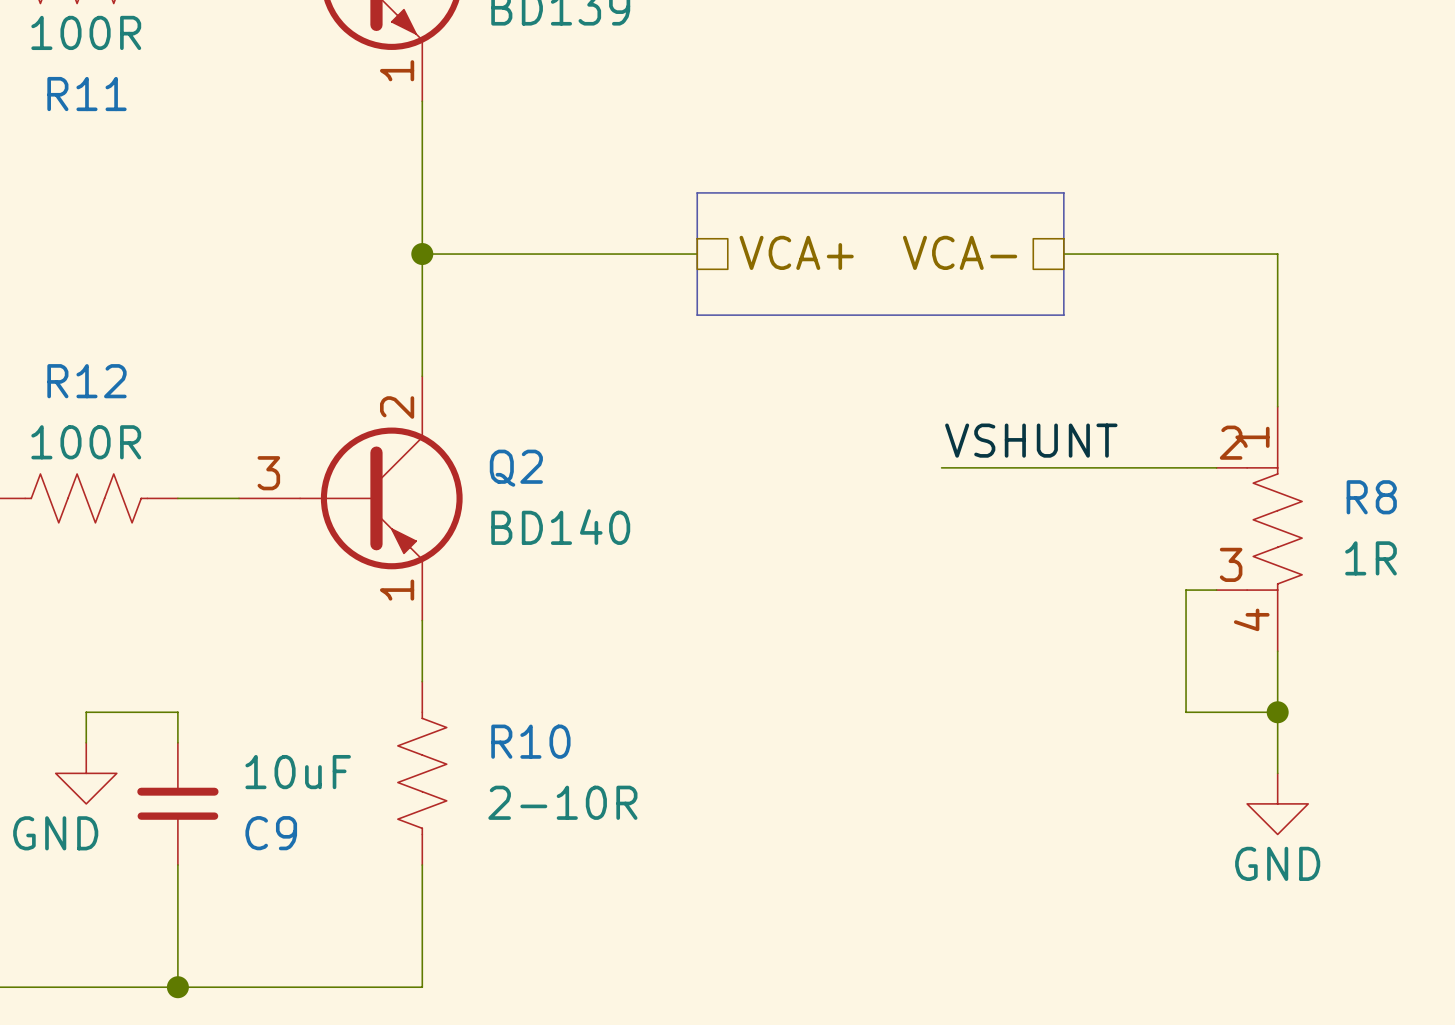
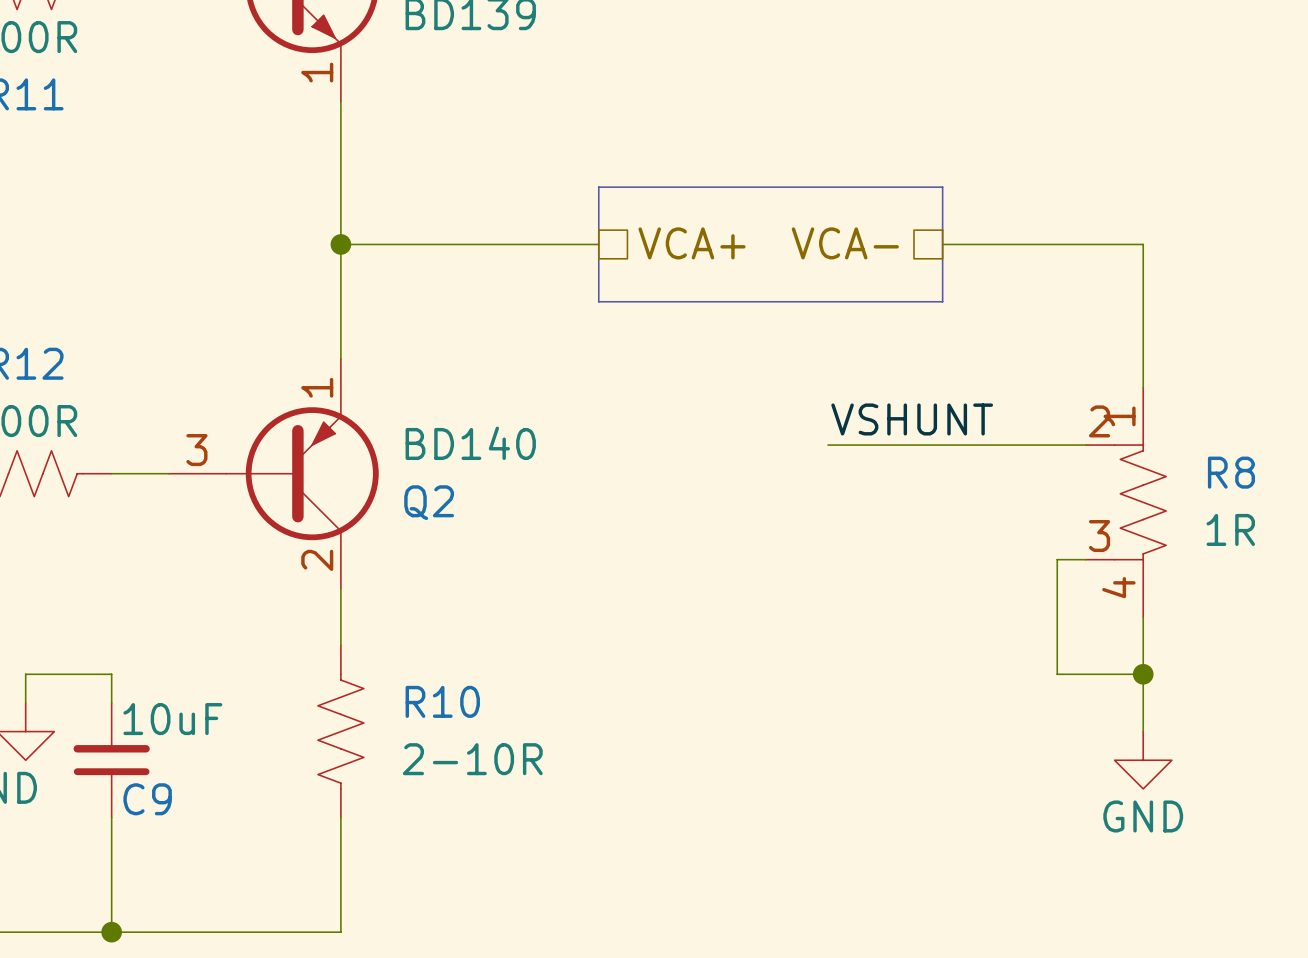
Q2 flip: as is (381, 498) -> up-down (302, 473)
C9 value position: 10uF (298, 772) -> 10uF (172, 719)
C9 name position: C9 (271, 833) -> C9 (147, 799)

